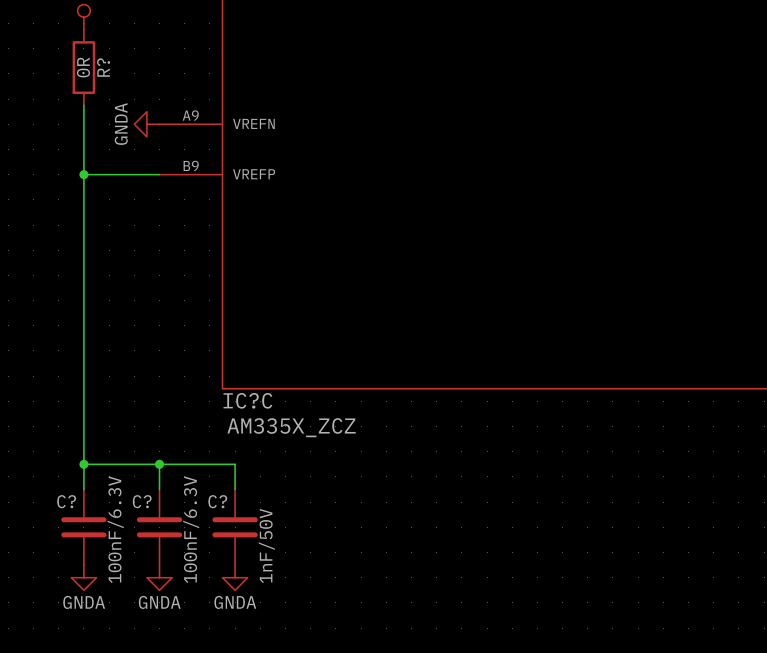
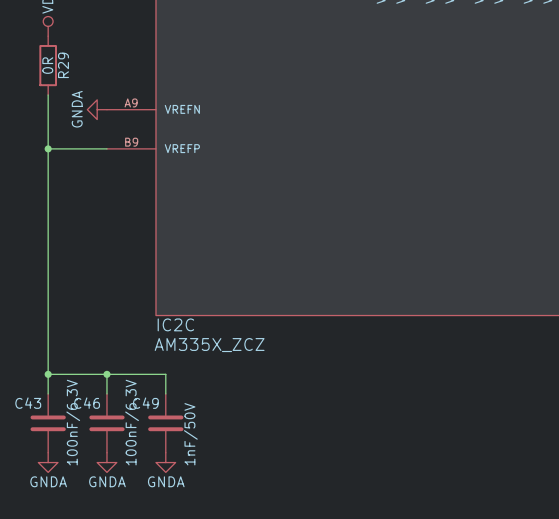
R? name: R? (103, 67) -> R29 (63, 65)
IC?C name: IC?C (247, 400) -> IC2C (175, 324)
C? name: C? (66, 501) -> C43 (28, 403)
C? name: C? (142, 501) -> C46 (87, 403)
C? name: C? (217, 501) -> C49 (145, 403)

